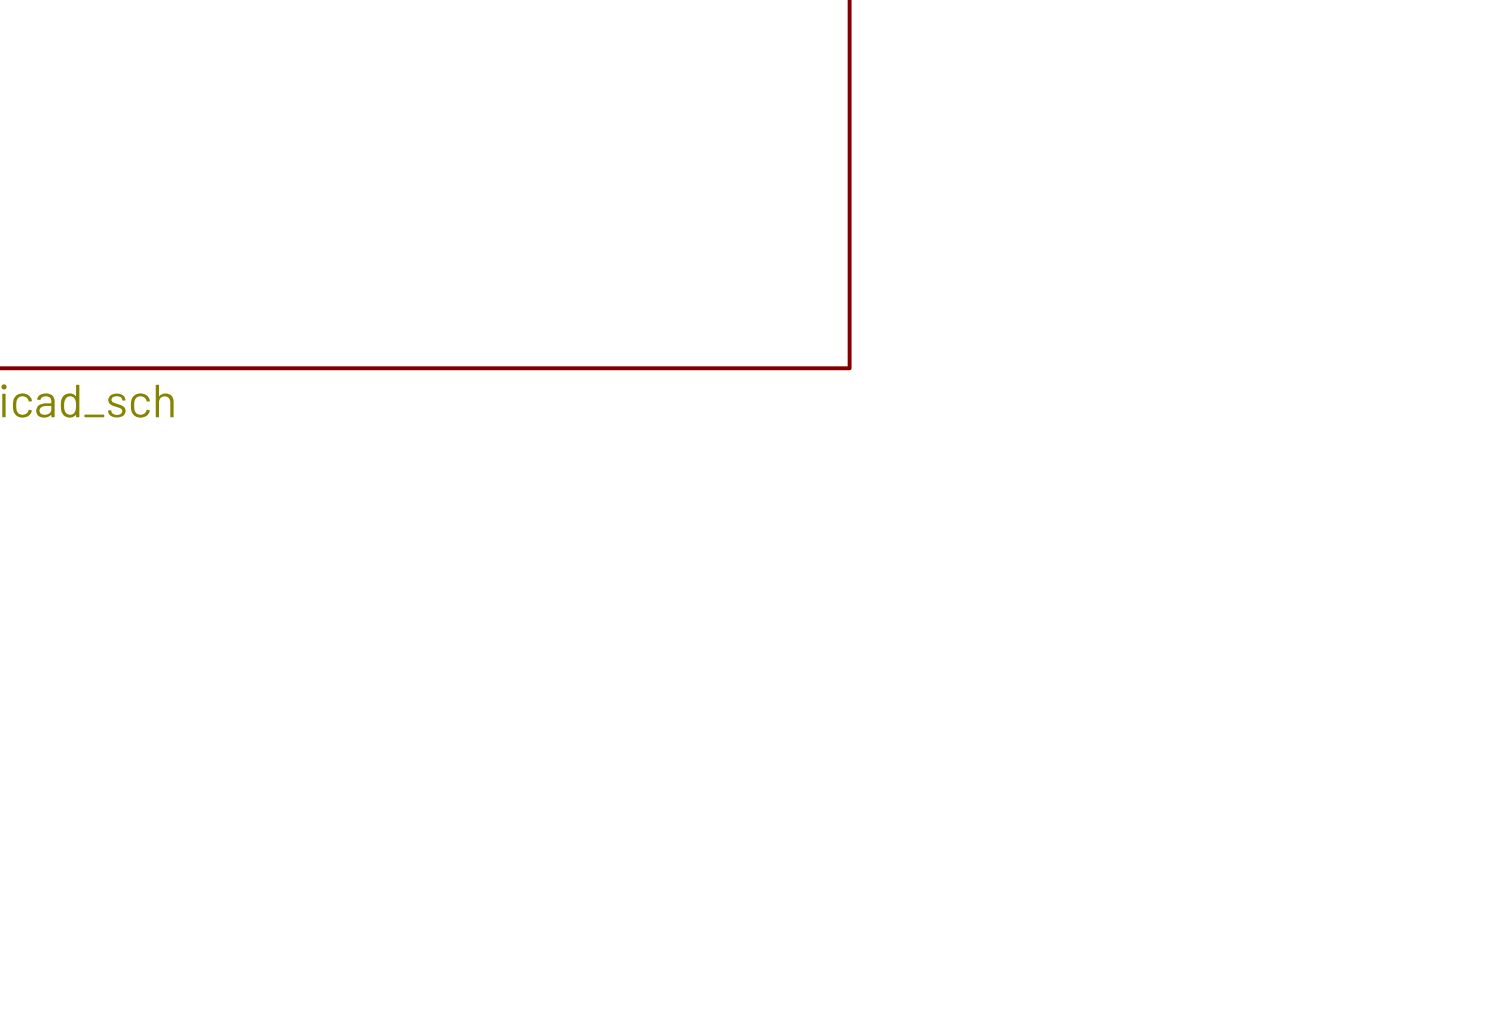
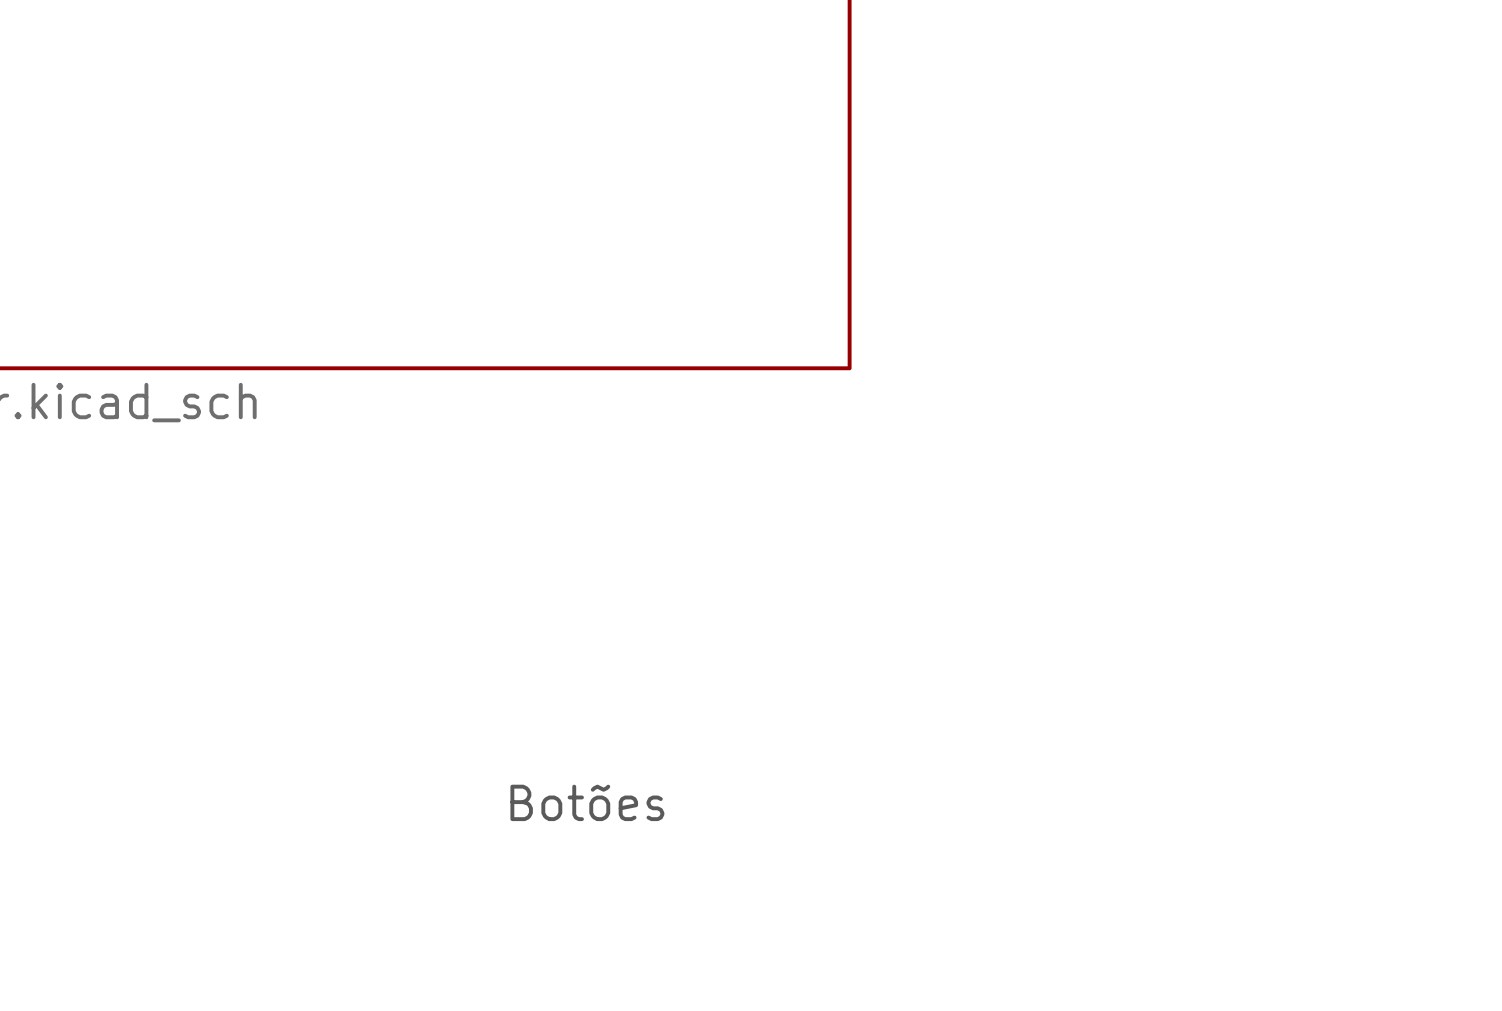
text: none -> Botões (587, 802)

